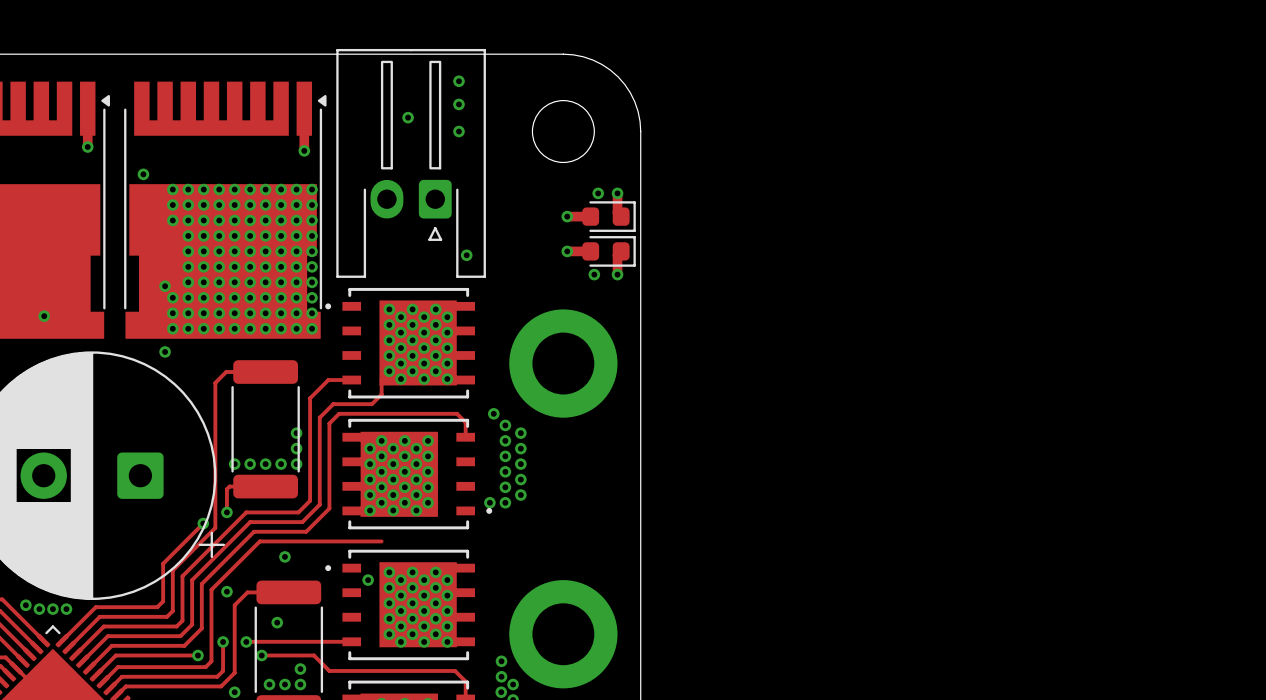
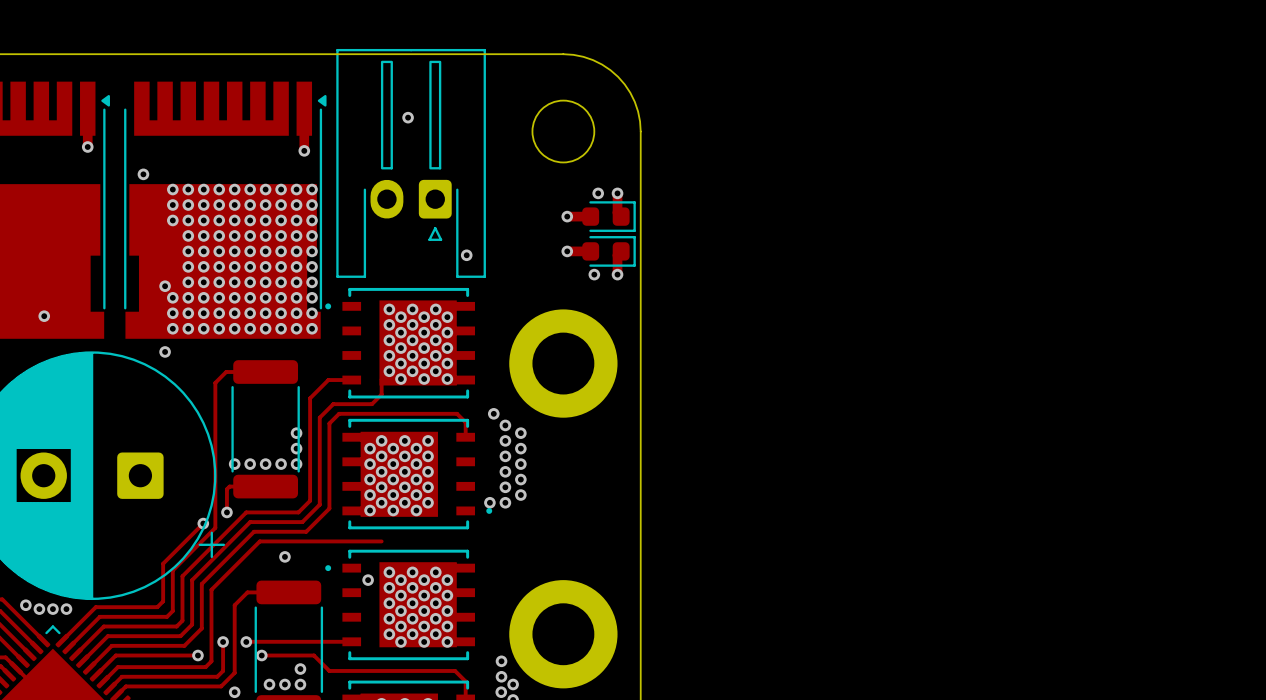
via: (458, 81) -> none
via: (458, 104) -> none
via: (458, 131) -> none
via: (226, 591) -> none
via: (277, 622) -> none

